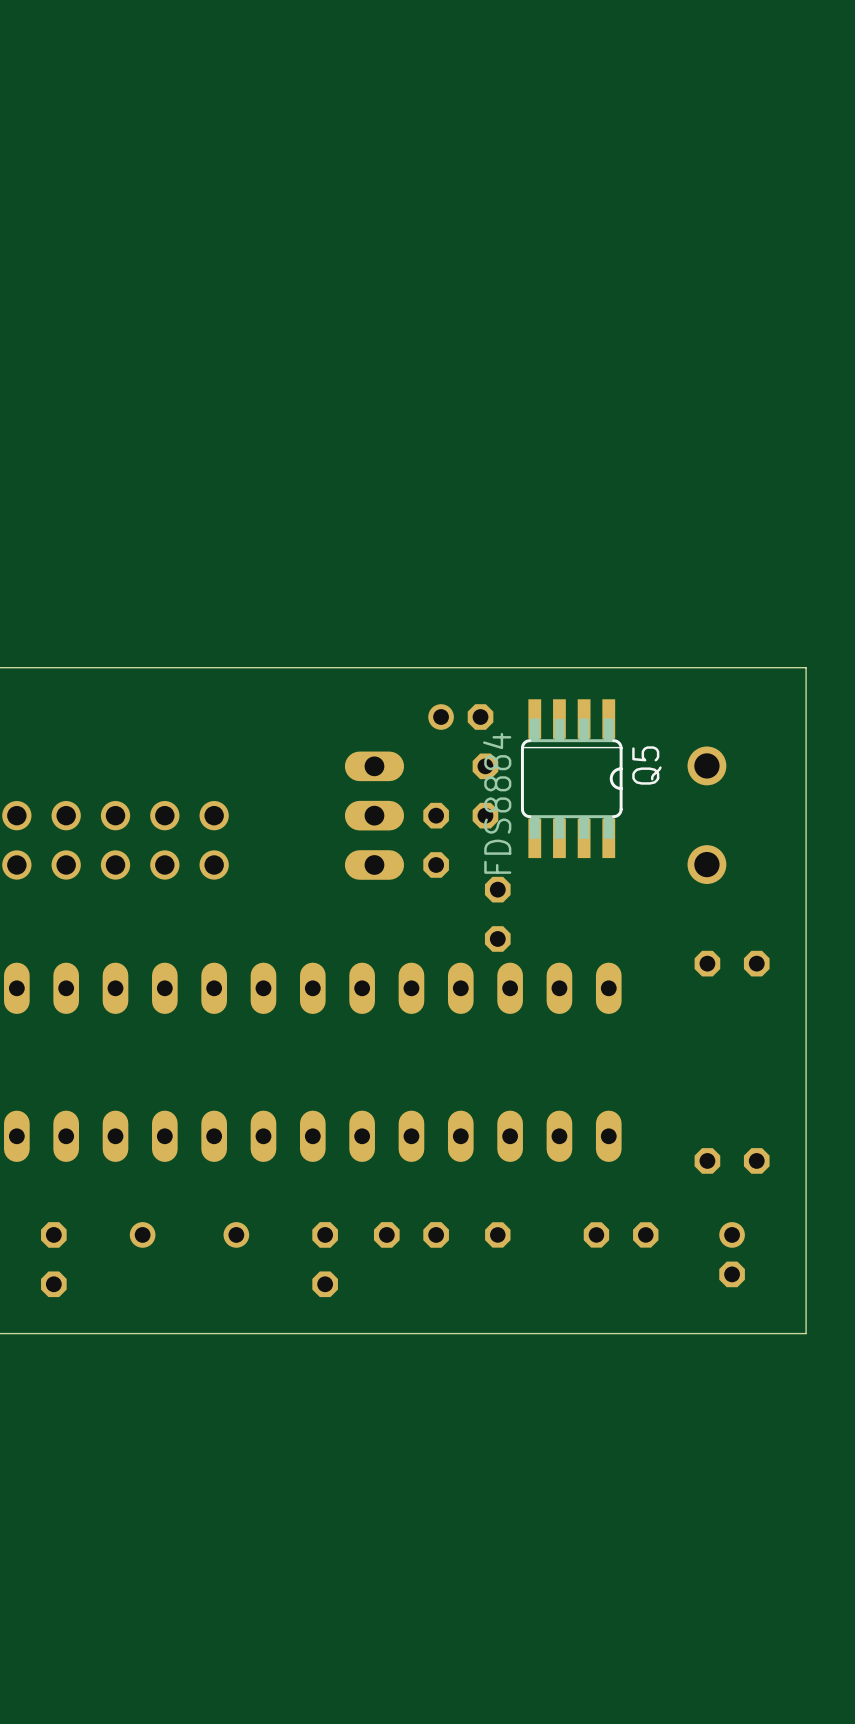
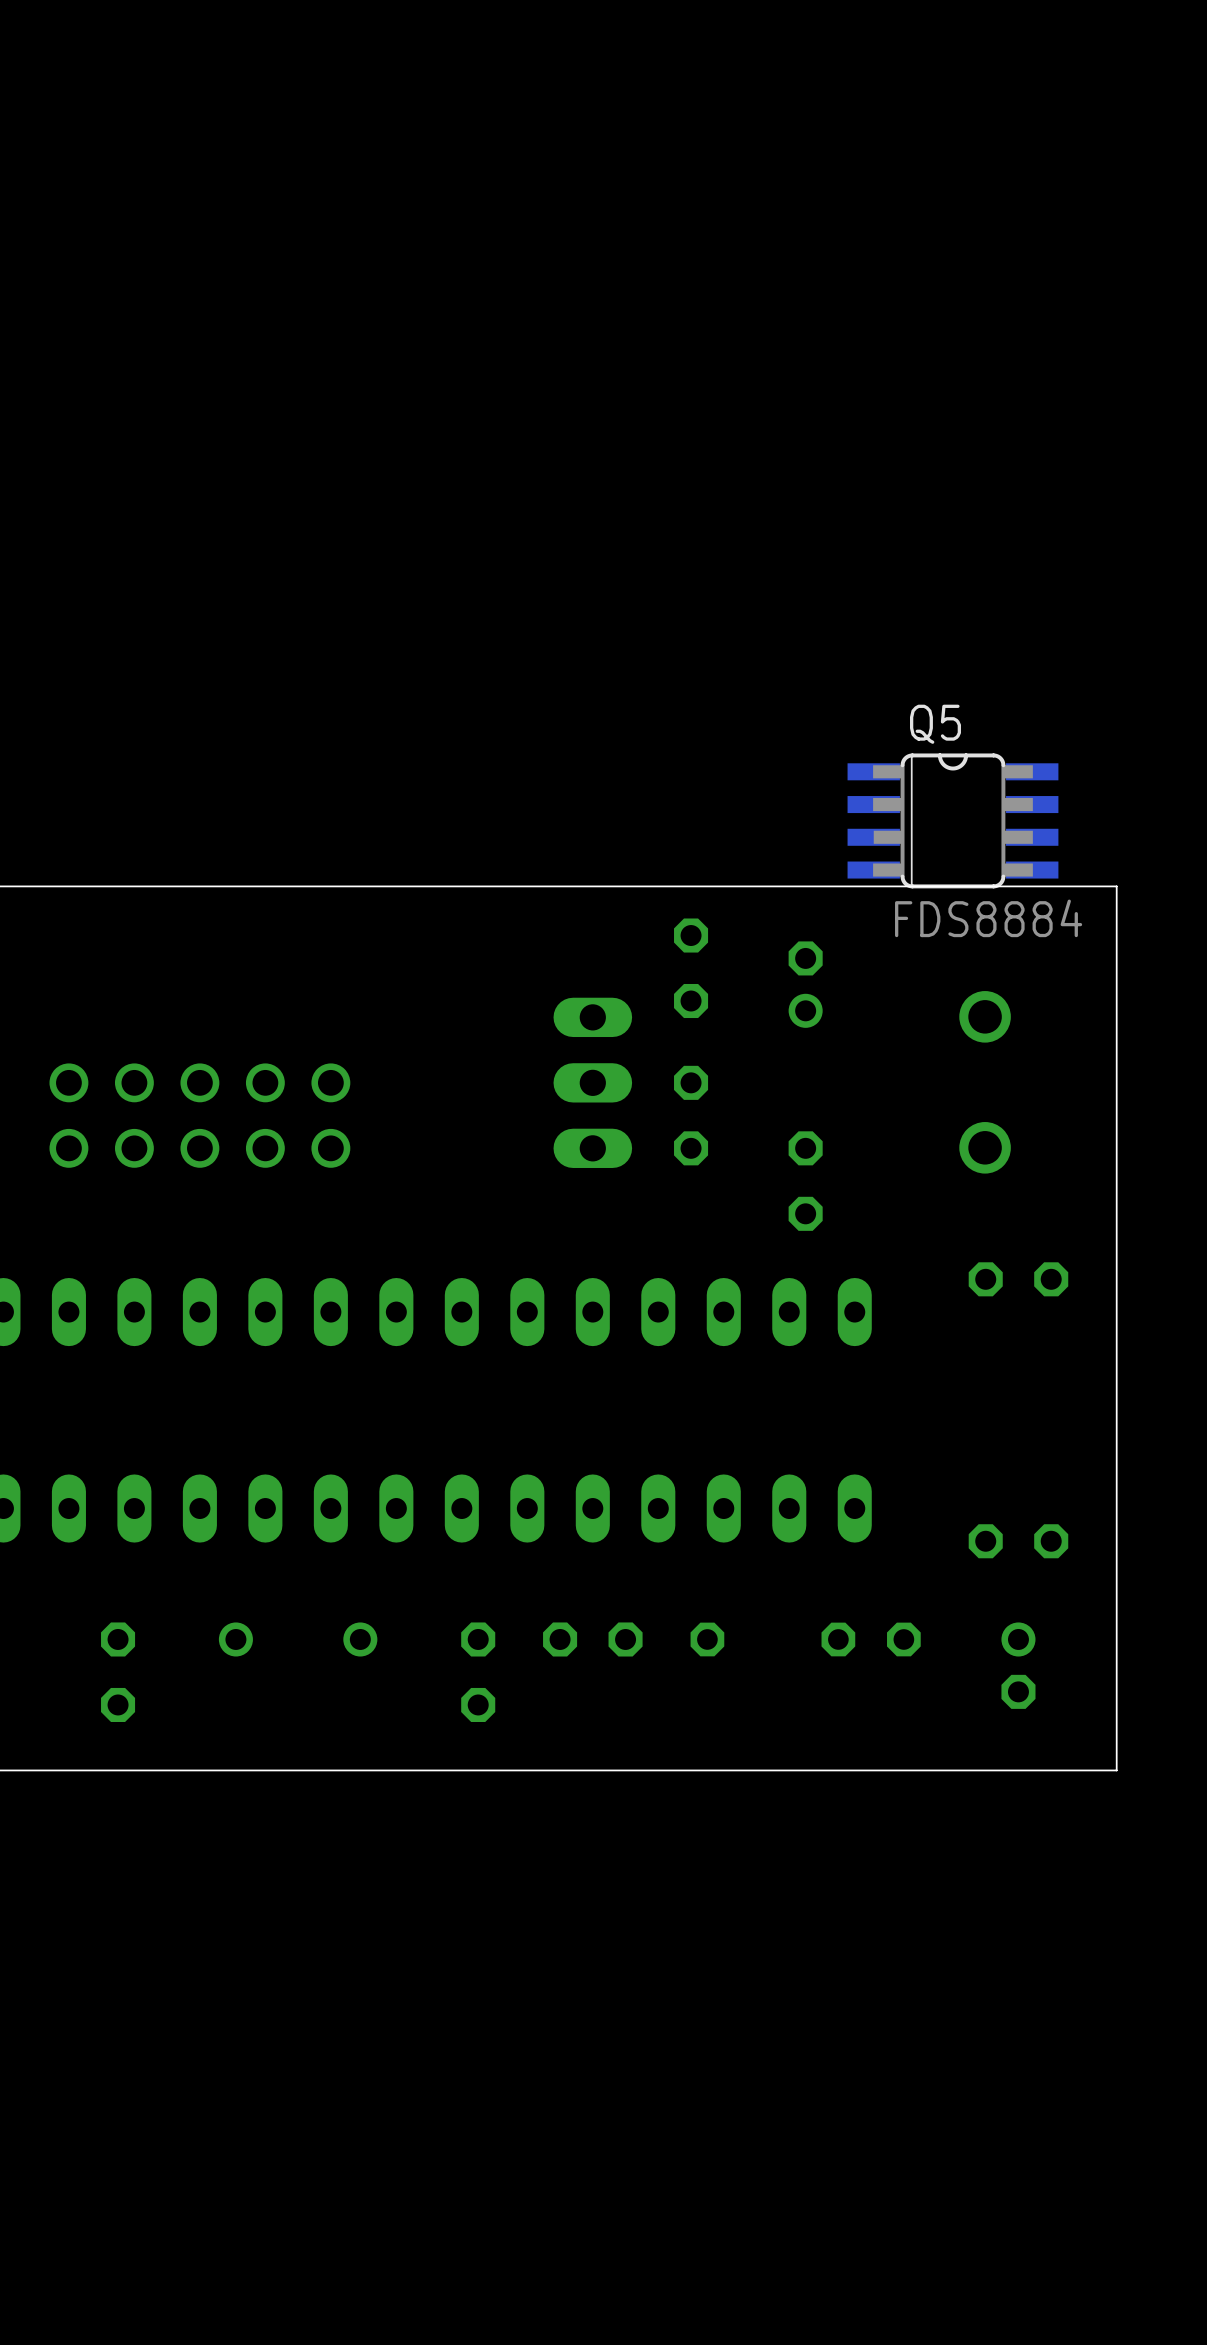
part rotation: 0° (460, 717) -> 90° counterclockwise (805, 984)
part position: (460, 717) -> (805, 984)
part: none -> (691, 968)
Q5 rotation: 0° (571, 778) -> 90° counterclockwise (952, 820)
Q5 position: (571, 778) -> (952, 820)
part: (485, 791) -> none
part position: (374, 815) -> (592, 1082)
part: (436, 840) -> none
part: none -> (691, 1115)
part: none -> (805, 1181)
part: (497, 914) -> none

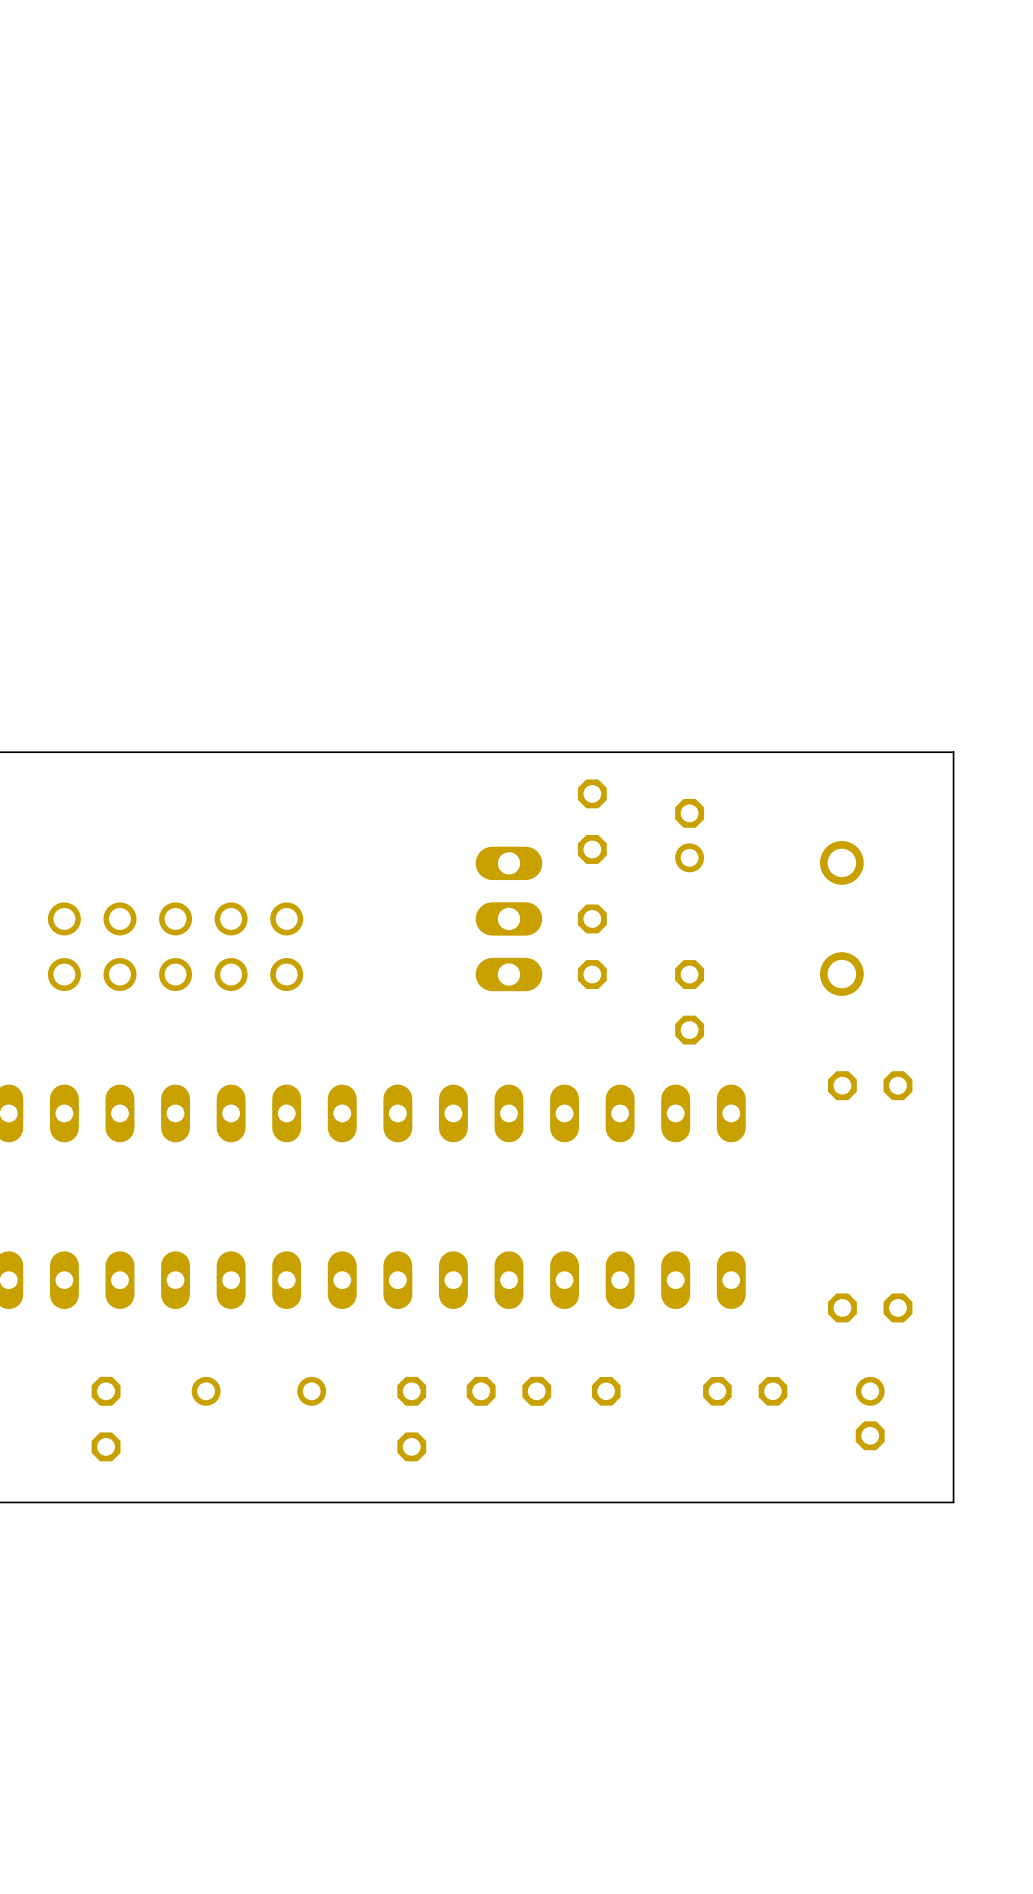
Q5: FDS8884 (952, 820) -> none

